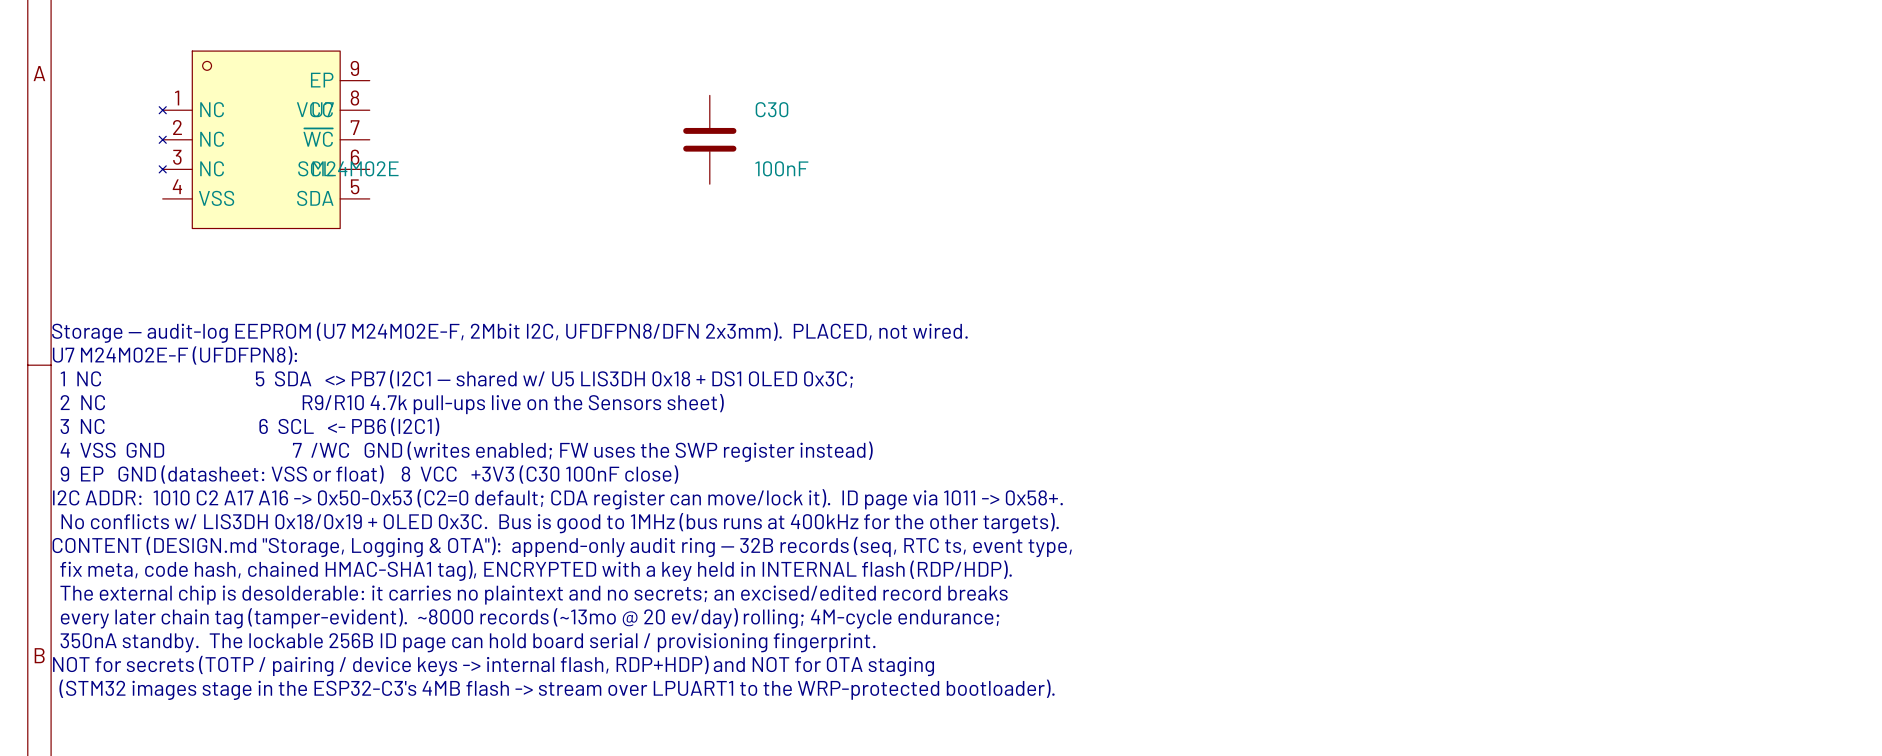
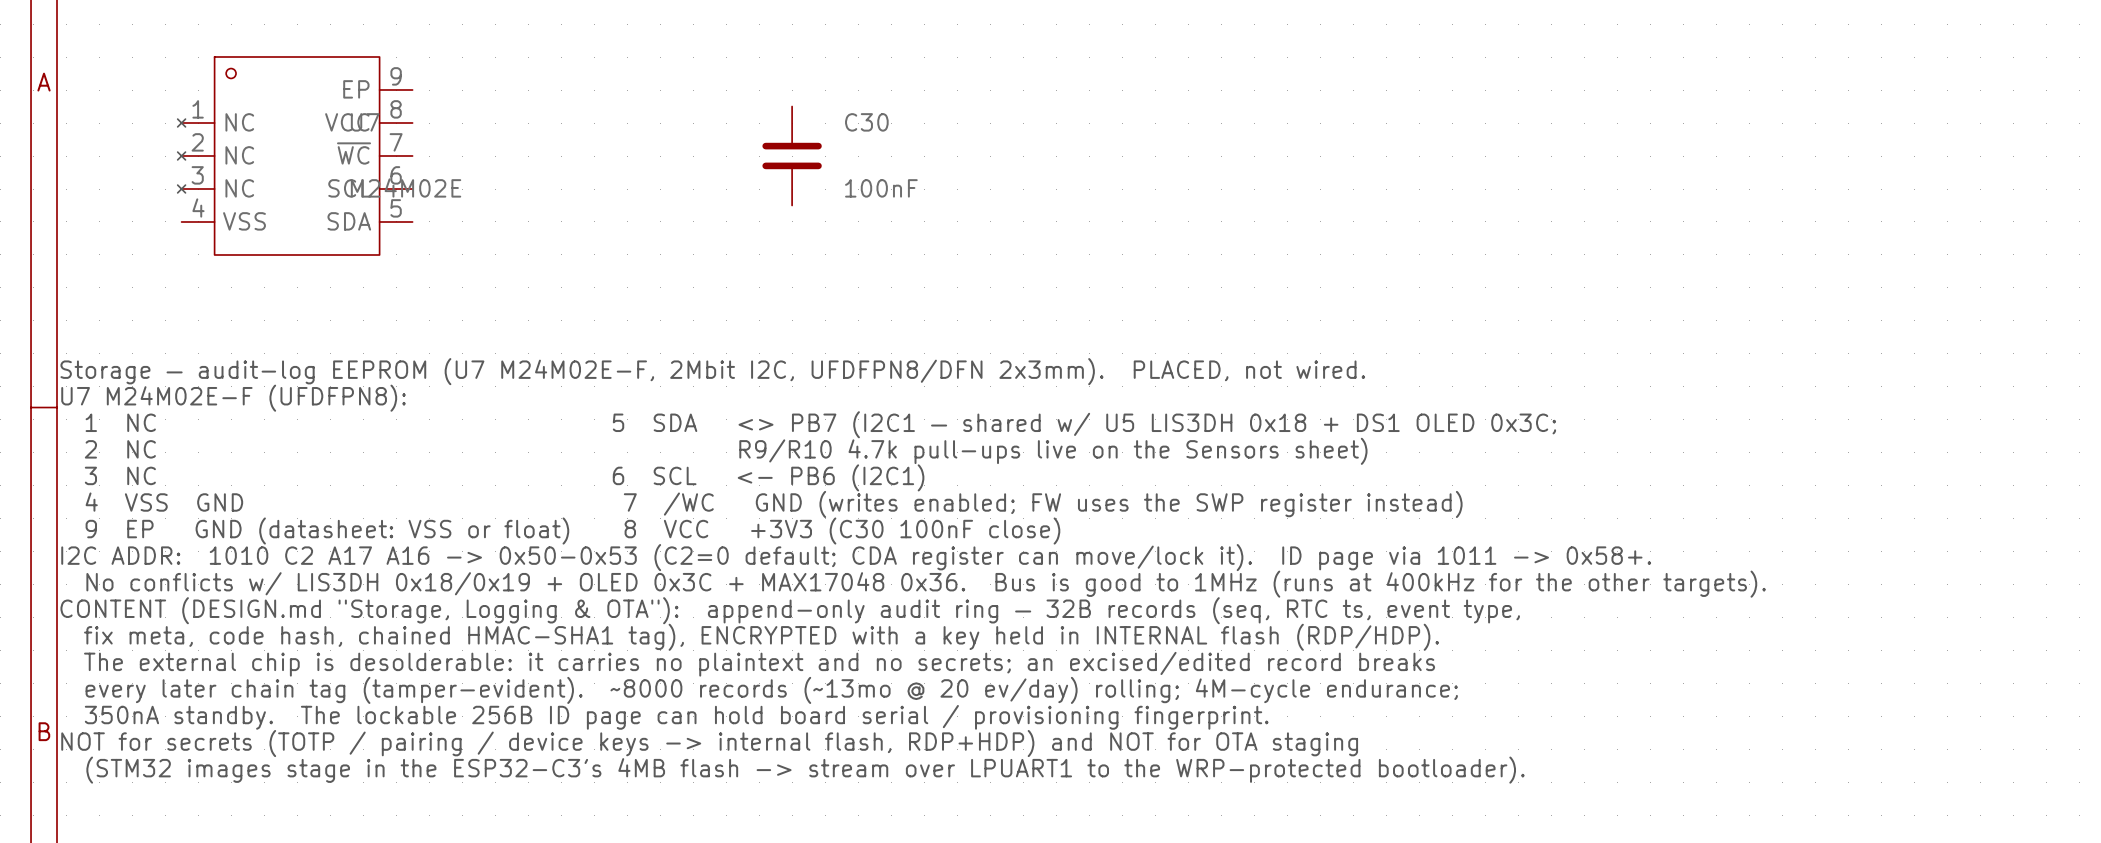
text: No conflicts w/ LIS3DH 0x18/0x19 + OLED 0x3C. Bus is good to 1MHz (bus runs at 400kHz for the other targets). (560, 523) -> No conflicts w/ LIS3DH 0x18/0x19 + OLED 0x3C + MAX17048 0x36. Bus is good to 1MHz (runs at 400kHz for the other targets). (926, 584)

